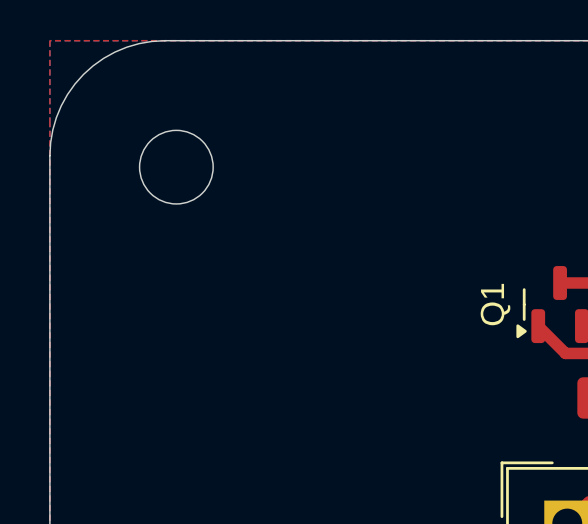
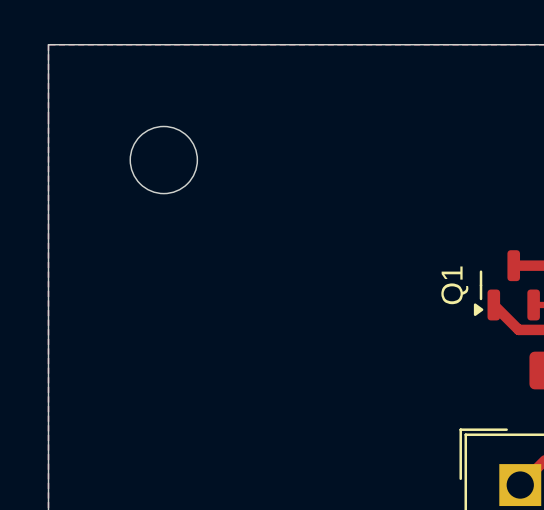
board edge: (164, 40) (139, 43) (114, 52) (83, 74) (61, 105) (52, 130) (49, 155) -> (153, 44) (48, 44) (48, 149)

